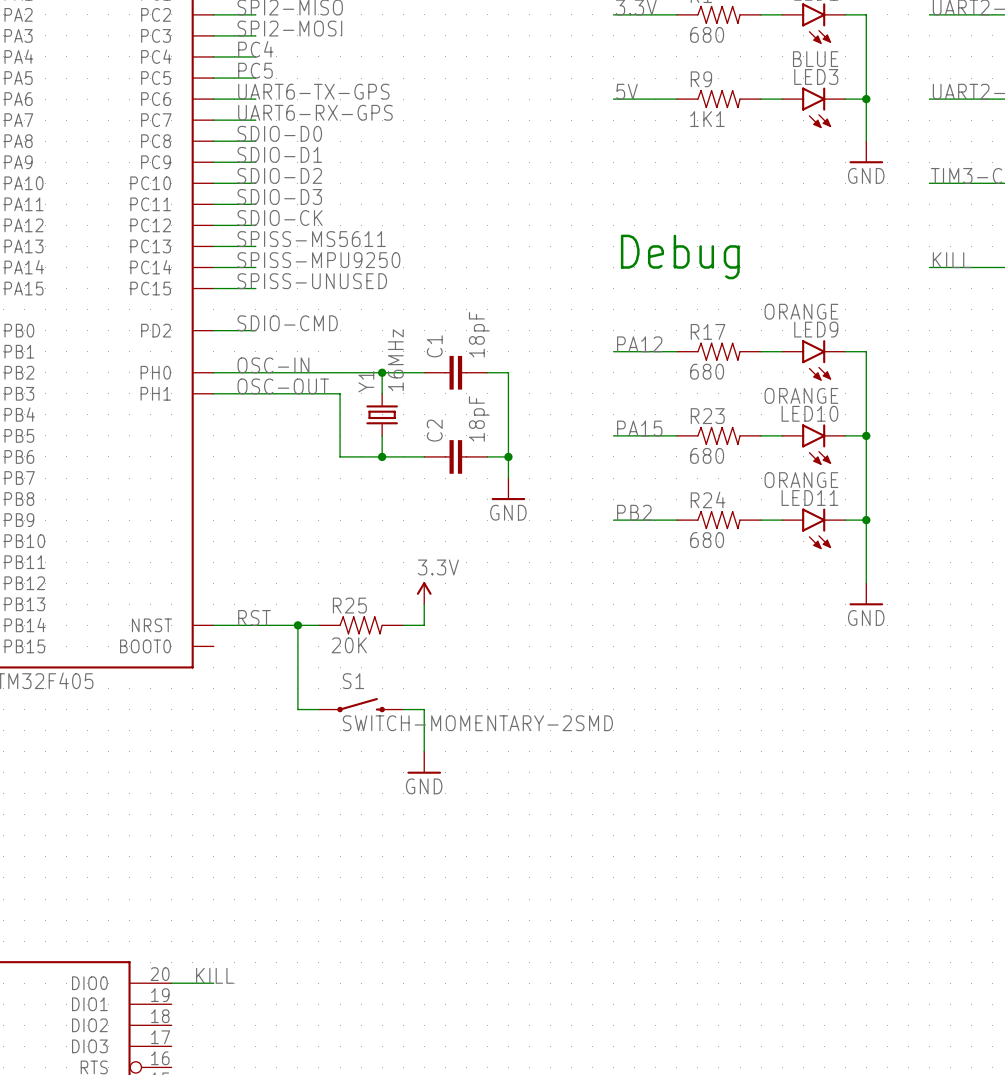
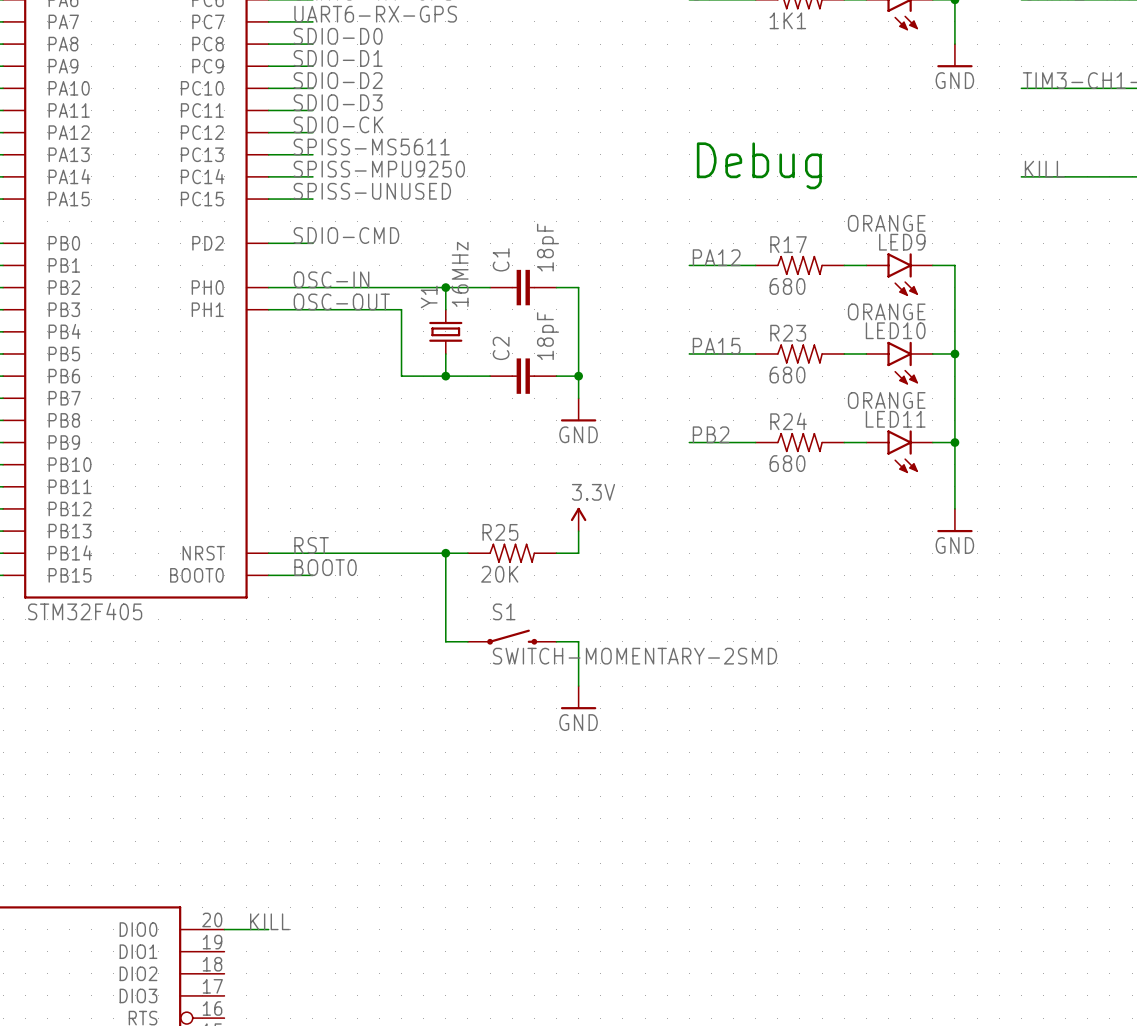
power symbol position: 3.3V (424, 593) -> 3.3V (578, 519)
wire: none -> (578, 531) (578, 553) (556, 553)
wire: (297, 625) (297, 709) (318, 709) -> none
junction: (297, 625) -> none
R25 position: (361, 625) -> (512, 553)
junction: none -> (445, 553)
label: none -> BOOT0 (325, 567)
wire: none -> (268, 575) (312, 575)
S1 position: (361, 705) -> (512, 637)
wire: (403, 709) (424, 709) (424, 751) -> (467, 641) (445, 641) (445, 553)
wire: none -> (556, 641) (578, 641) (578, 686)
power symbol position: GND (424, 762) -> GND (578, 697)

